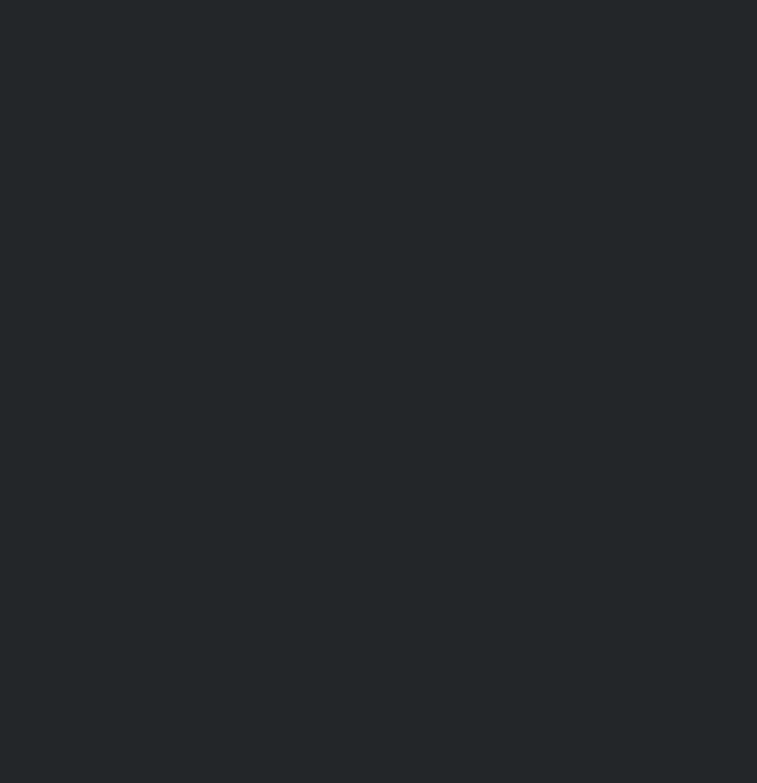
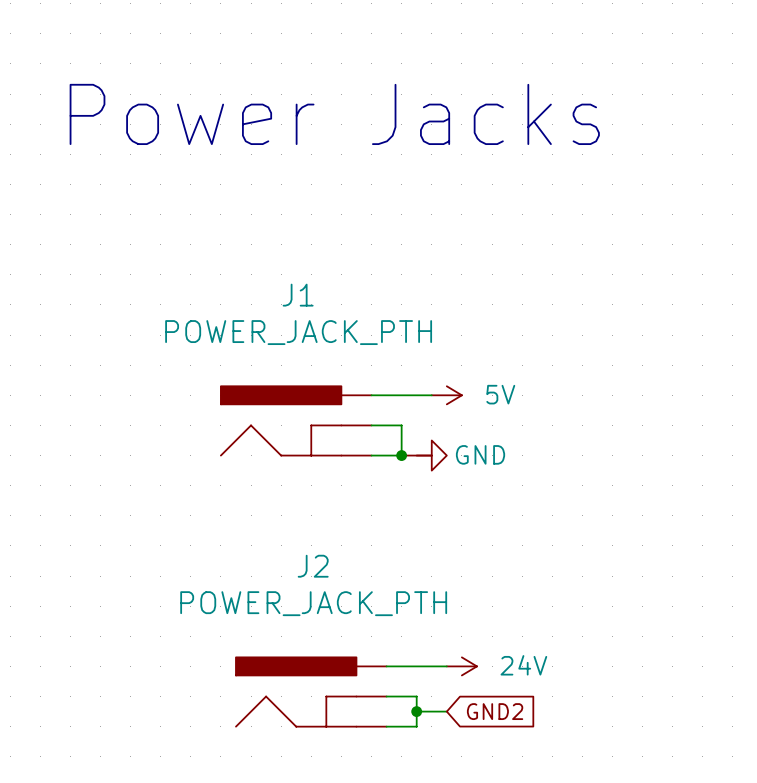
text: none -> Power Jacks (334, 114)
wire: none -> (371, 395) (431, 395)
power symbol: none -> 5V (446, 395)
J1: none -> POWER_JACK_PTH (296, 420)
wire: none -> (371, 425) (401, 425) (401, 455) (371, 455)
junction: none -> (401, 455)
power symbol: none -> GND (424, 455)
wire: none -> (386, 666) (446, 666)
power symbol: none -> 24V (461, 666)
J2: none -> POWER_JACK_PTH (311, 692)
wire: none -> (386, 696) (416, 696) (416, 726) (386, 726)
wire: none -> (416, 711) (446, 711)
junction: none -> (416, 711)
global label: none -> GND2 (495, 711)

